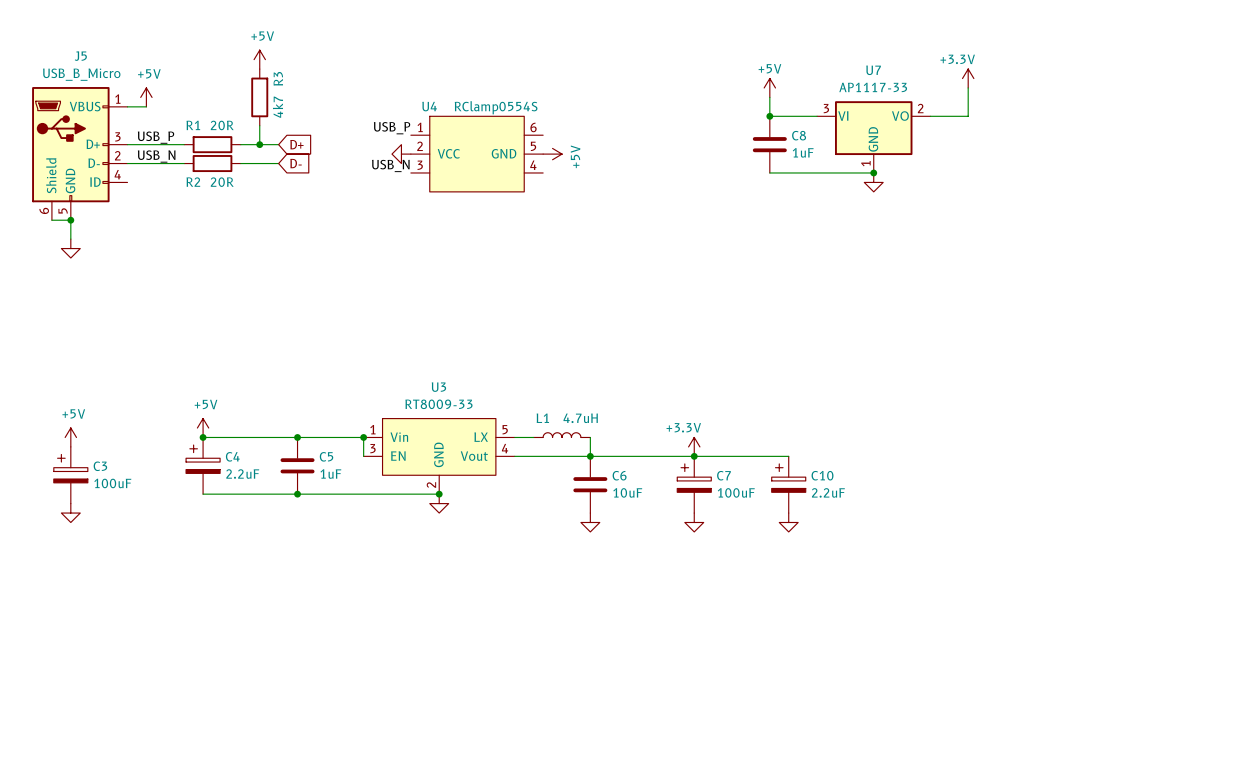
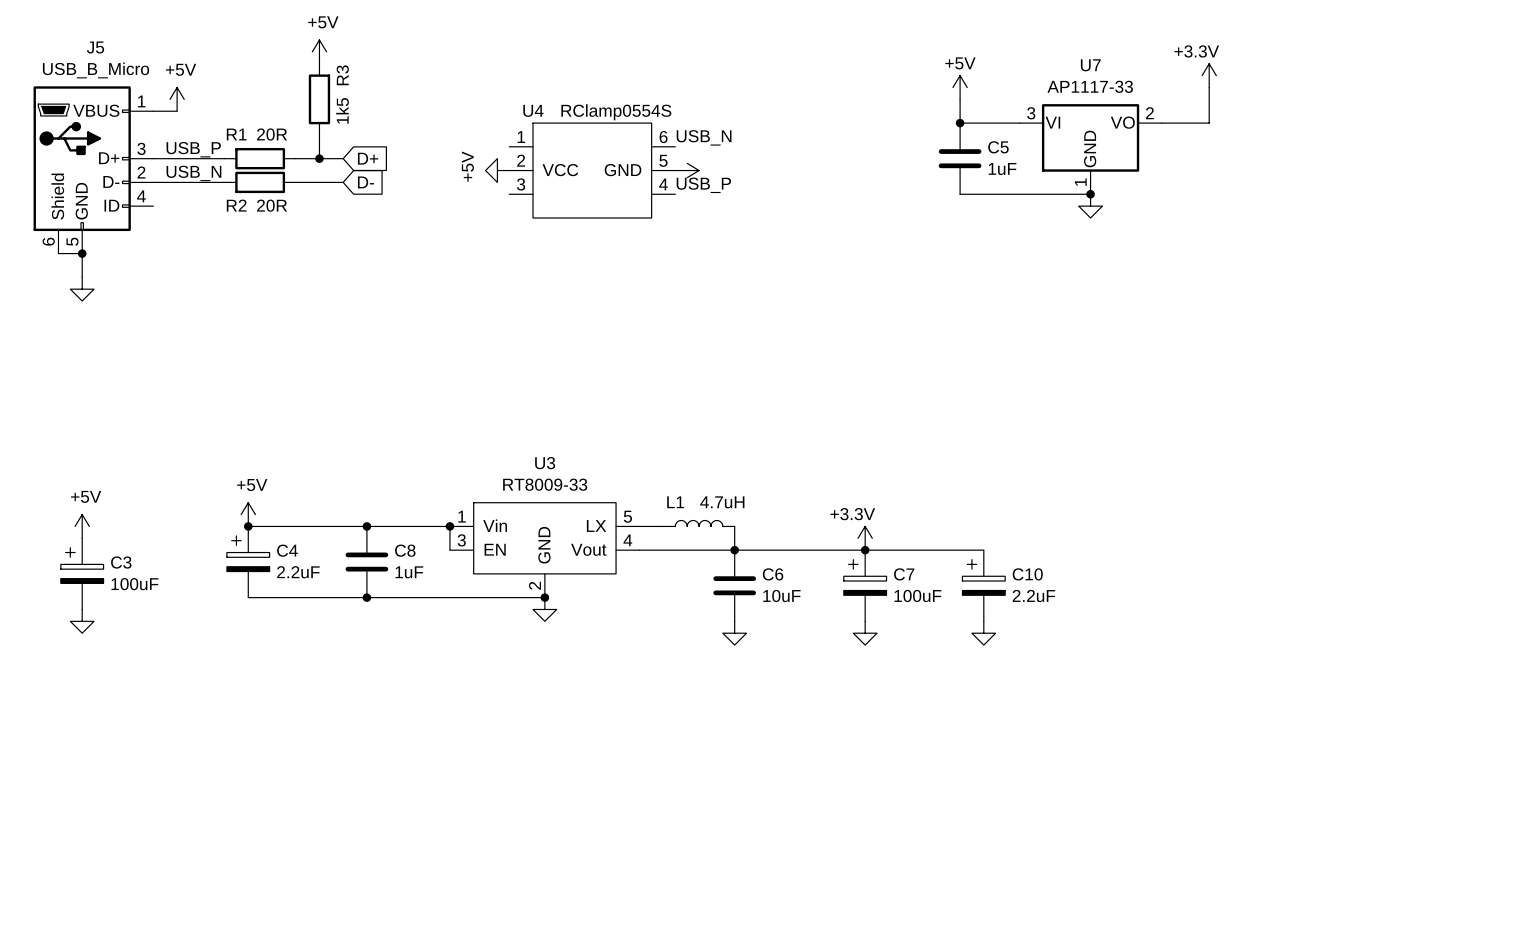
R3 value: 4k7 (277, 107) -> 1k5 (342, 110)
label position: USB_P (392, 128) -> USB_P (703, 185)
C8 name: C8 (799, 135) -> C5 (998, 147)
power symbol text: none -> +5V (467, 166)
power symbol text: +5V (575, 156) -> none
label position: USB_N (390, 165) -> USB_N (704, 137)
C5 name: C5 (326, 456) -> C8 (405, 550)

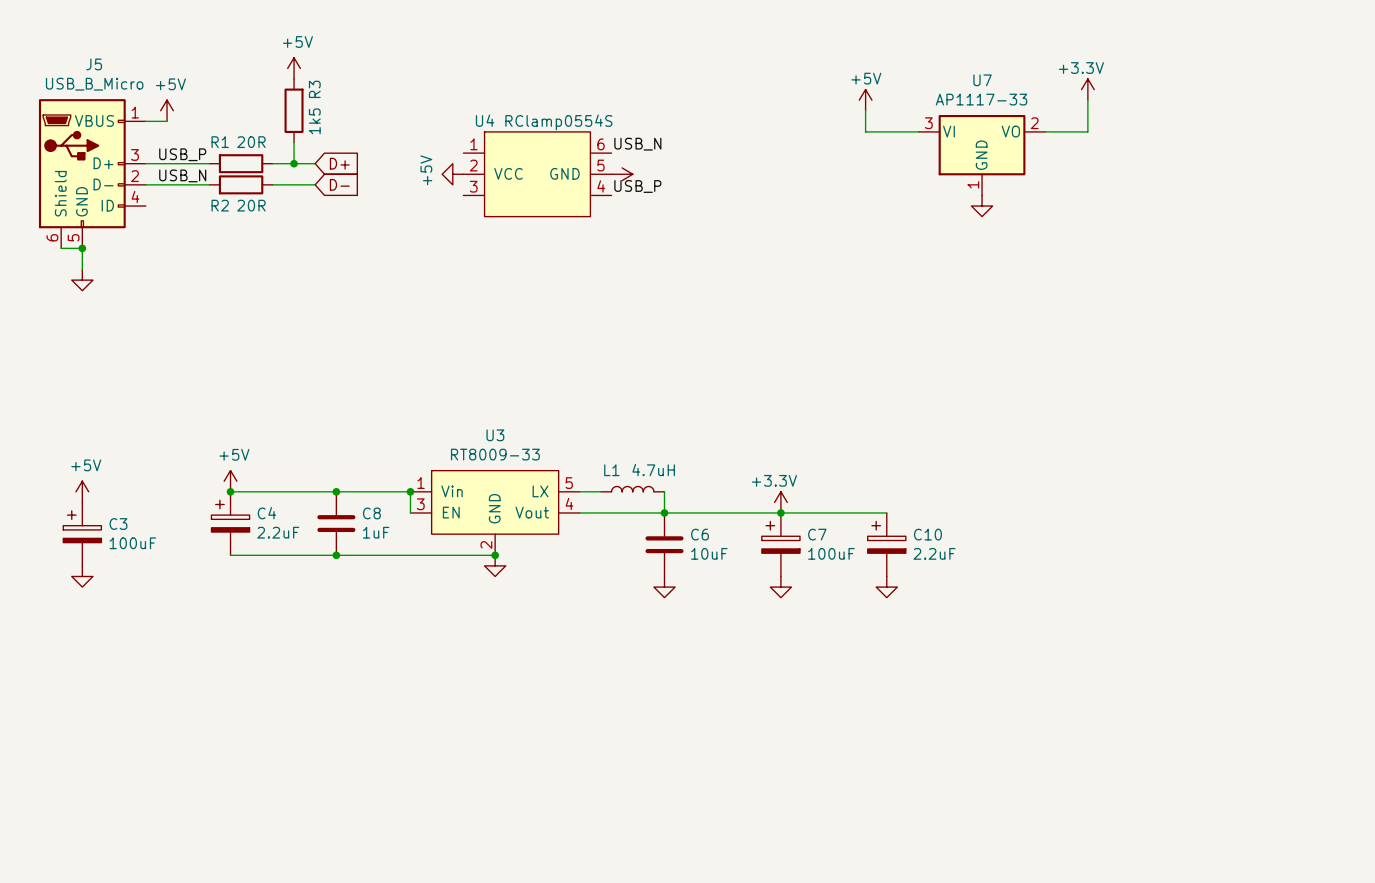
junction: (960, 123) -> none
C5: 1uF (960, 158) -> none
wire: (960, 194) (1090, 194) -> none
junction: (1090, 194) -> none

